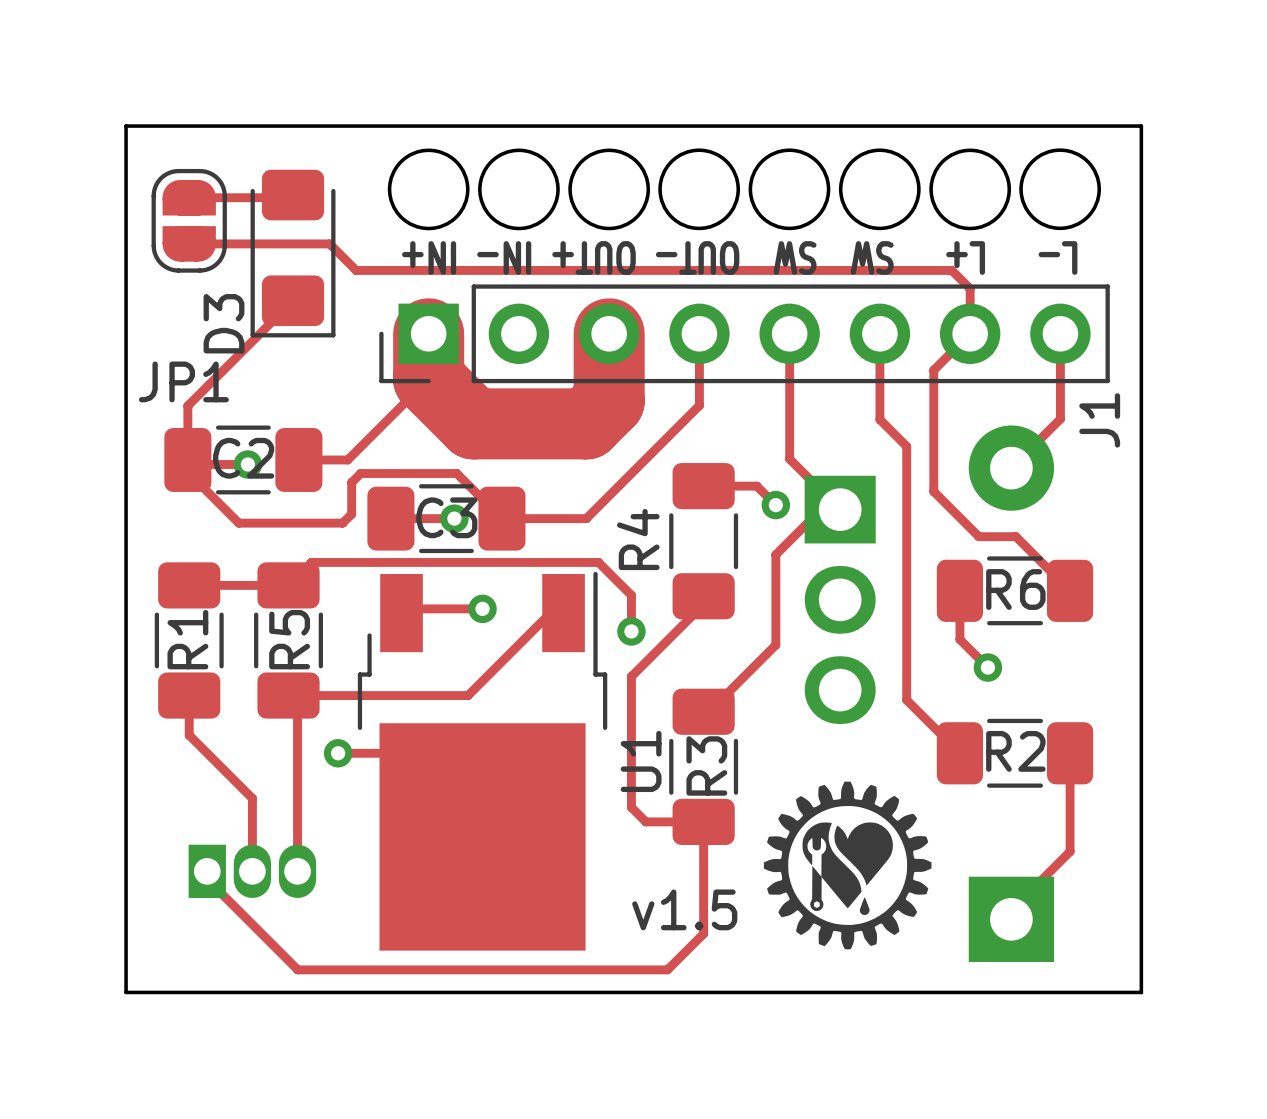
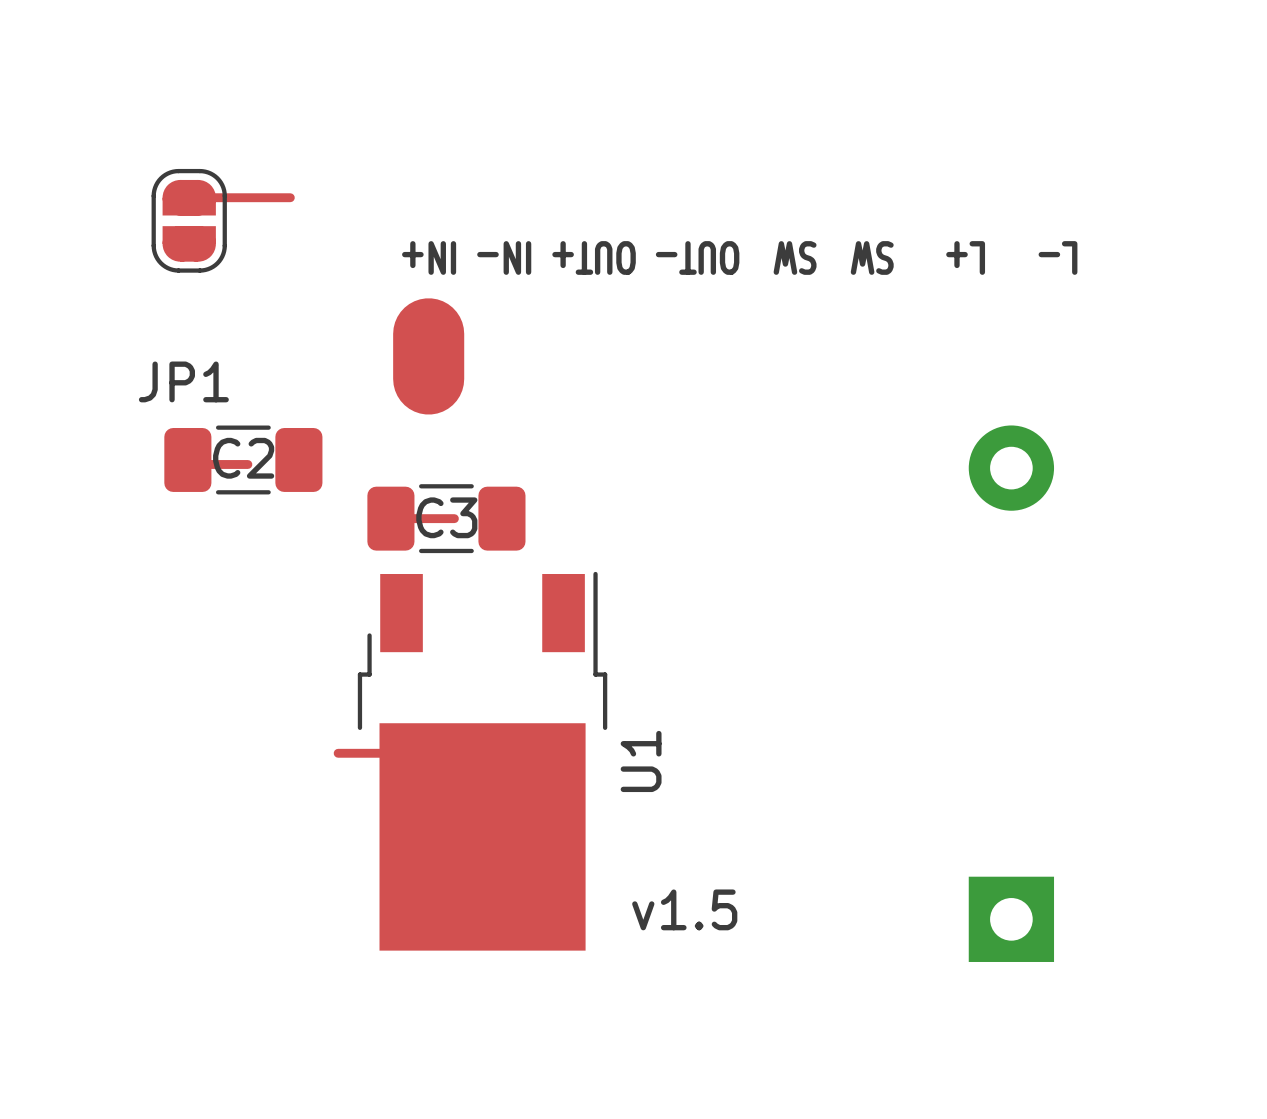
board edge: (126, 126) (1141, 126) (1141, 992) (126, 992) (126, 126) -> none
round board edge: [387, 148, 470, 231] -> none
round board edge: [478, 148, 560, 231] -> none
round board edge: [568, 148, 651, 231] -> none
round board edge: [658, 148, 741, 231] -> none
round board edge: [748, 148, 831, 231] -> none
round board edge: [838, 148, 921, 231] -> none
round board edge: [929, 148, 1012, 231] -> none
round board edge: [1019, 148, 1101, 231] -> none
track: (189, 243) (329, 243) (356, 270) (951, 270) (970, 288) (970, 333) (933, 370) (933, 491) (978, 536) (1015, 536) (1070, 590) -> none
D3: (293, 253) -> none
track: (293, 300) (187, 405) (187, 472) (238, 523) (342, 523) (351, 514) (351, 482) (360, 473) (456, 473) (501, 518) (586, 518) (699, 405) (699, 333) -> none
track: (609, 333) (609, 401) (586, 423) (473, 423) (428, 379) (347, 459) (298, 459) -> none
J1: (744, 333) -> none
track: (789, 333) (789, 459) (840, 509) (820, 509) (775, 554) (775, 644) (709, 711) (703, 711) -> none
track: (879, 333) (879, 419) (906, 446) (906, 700) (959, 753) -> none
track: (1060, 333) (1060, 419) (1011, 468) -> none
via: (247, 464) -> none
track: (703, 486) (756, 486) (775, 505) -> none
via: (775, 505) -> none
via: (454, 518) -> none
R4: (703, 541) -> none
track: (189, 585) (288, 585) (311, 562) (598, 562) (631, 595) (631, 631) -> none
track: (959, 590) (959, 639) (987, 667) -> none
R6: (1015, 590) -> none
track: (703, 596) (703, 604) (631, 676) (631, 807) (645, 821) (703, 821) (703, 933) (667, 969) (297, 969) (207, 879) (207, 871) -> none
part: (840, 599) -> none
track: (482, 608) (405, 608) (401, 613) -> none
via: (482, 608) -> none
track: (563, 613) (550, 613) (468, 695) (288, 695) (297, 704) (297, 871) -> none
via: (631, 631) -> none
R1: (189, 640) -> none
R5: (288, 640) -> none
via: (987, 667) -> none
track: (189, 695) (189, 735) (252, 798) (252, 871) -> none
via: (338, 753) -> none
R2: (1015, 753) -> none
track: (1070, 753) (1070, 851) (1011, 910) (1011, 919) -> none
R3: (703, 766) -> none
drawing: [763, 781, 932, 950] -> none
part: (252, 871) -> none

